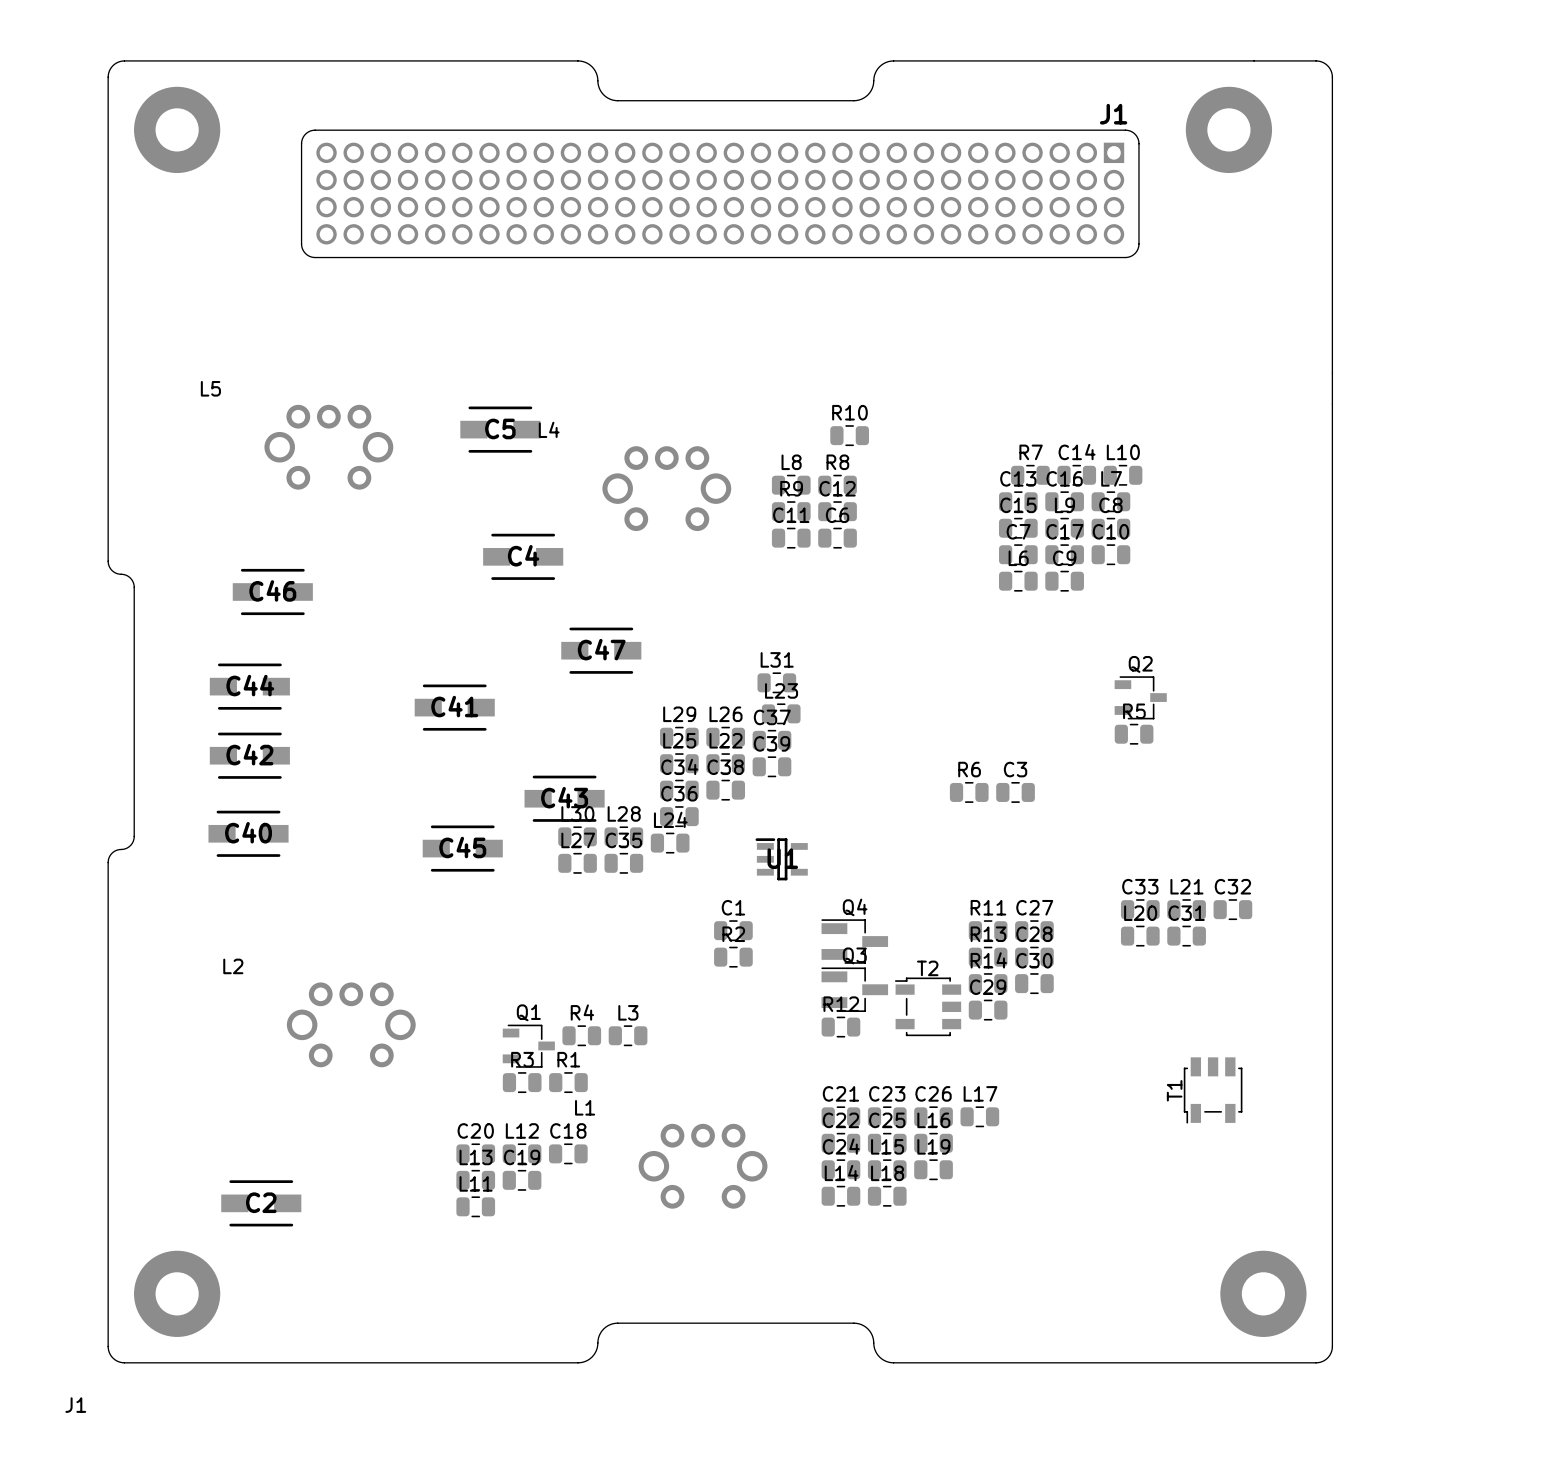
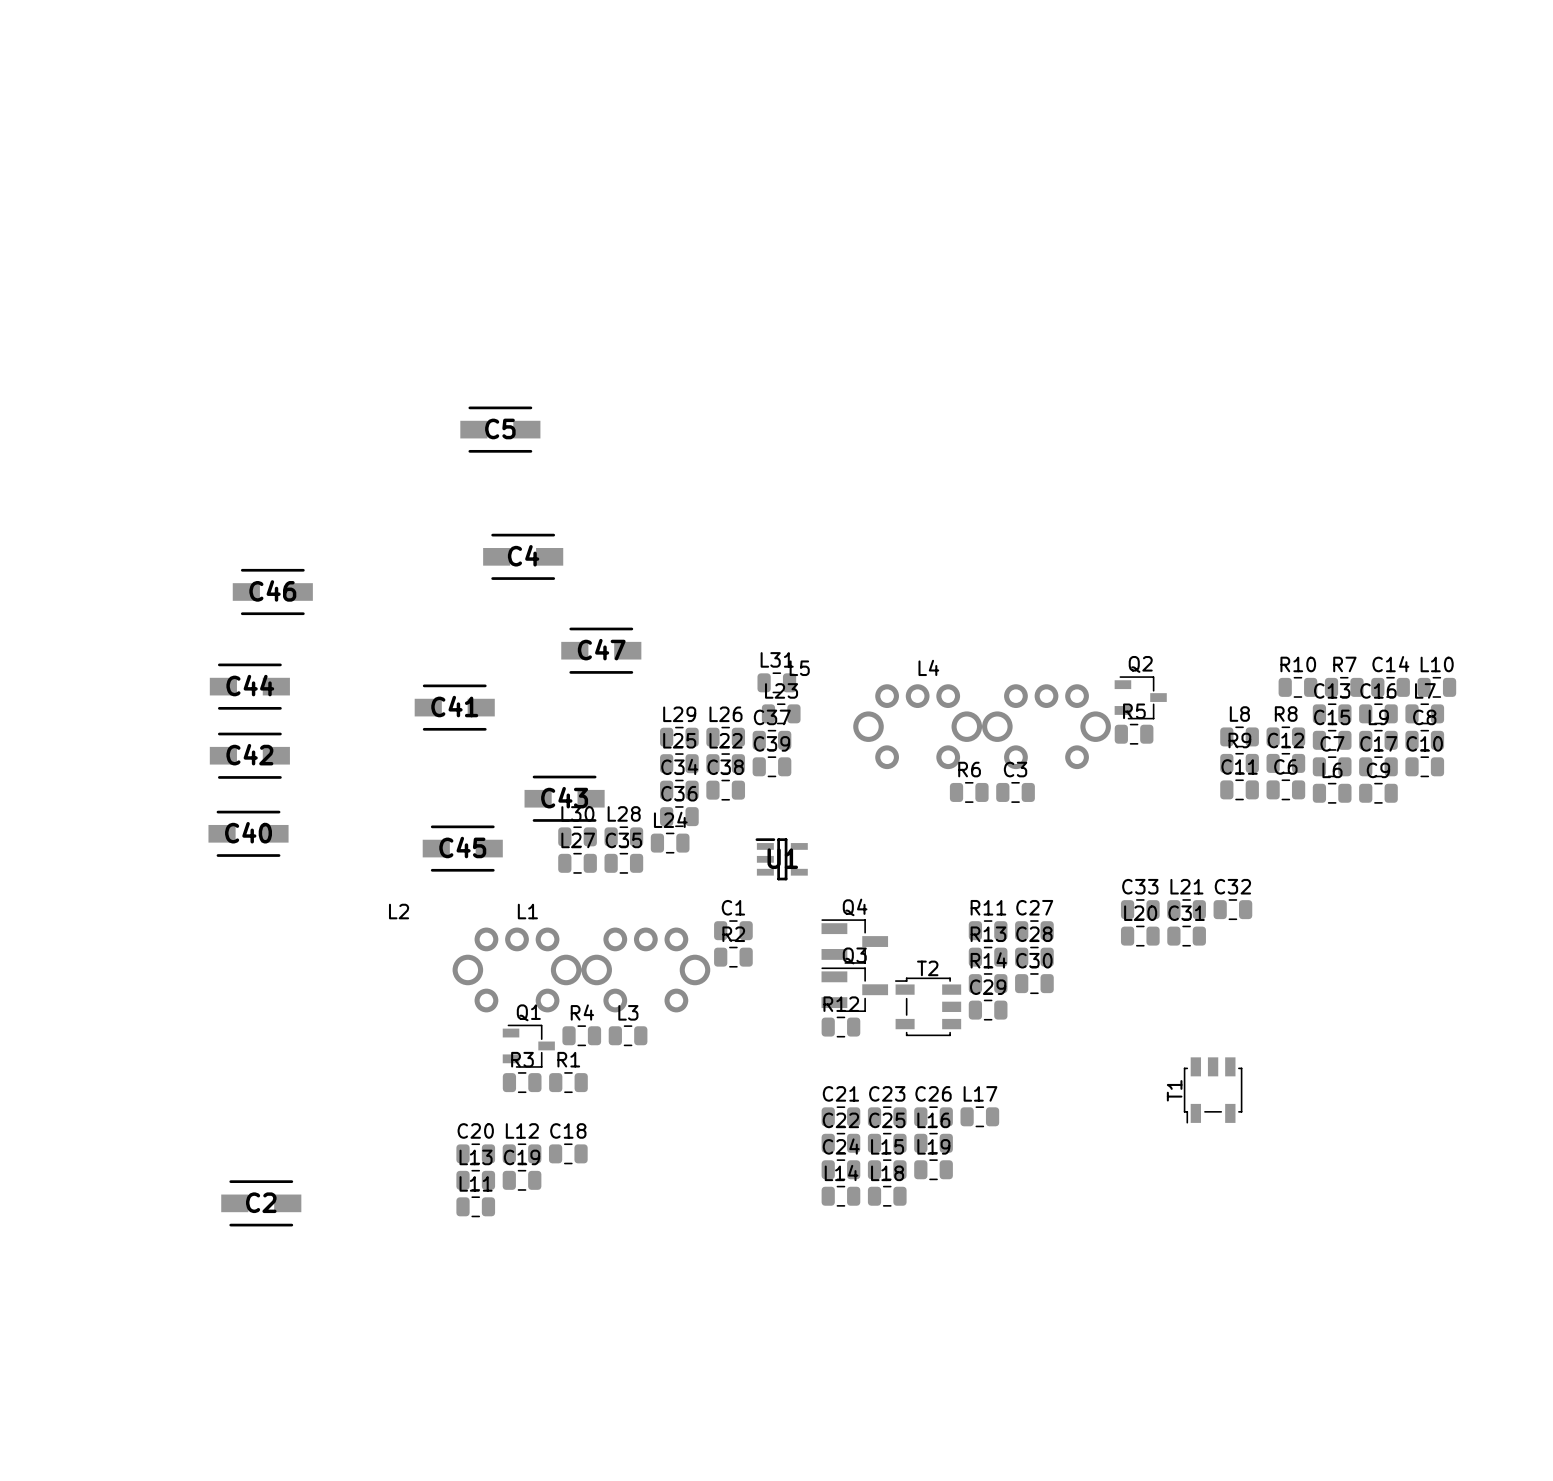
R10 position: (849, 435) -> (1297, 687)
L5 position: (328, 447) -> (917, 726)
R7 position: (1030, 475) -> (1344, 687)
C14 position: (1076, 475) -> (1390, 687)
L10 position: (1123, 475) -> (1436, 687)
L8 position: (791, 485) -> (1239, 736)
R8 position: (837, 485) -> (1285, 736)
L4 position: (666, 488) -> (1046, 726)
C13 position: (1018, 501) -> (1332, 713)
C16 position: (1064, 501) -> (1378, 713)
L7 position: (1110, 501) -> (1424, 713)
R9 position: (791, 511) -> (1239, 763)
C12 position: (837, 511) -> (1285, 763)
C15 position: (1018, 528) -> (1332, 740)
L9 position: (1064, 528) -> (1378, 740)
C8 position: (1110, 528) -> (1424, 740)
C11 position: (791, 538) -> (1239, 789)
C6 position: (837, 538) -> (1285, 789)
C7 position: (1018, 554) -> (1332, 766)
C17 position: (1064, 554) -> (1378, 766)
C10 position: (1110, 554) -> (1424, 766)
L6 position: (1018, 581) -> (1332, 793)
C9 position: (1064, 581) -> (1378, 793)
J1: (720, 711) -> none
L2 position: (351, 1024) -> (517, 969)
L1 position: (703, 1166) -> (645, 969)

